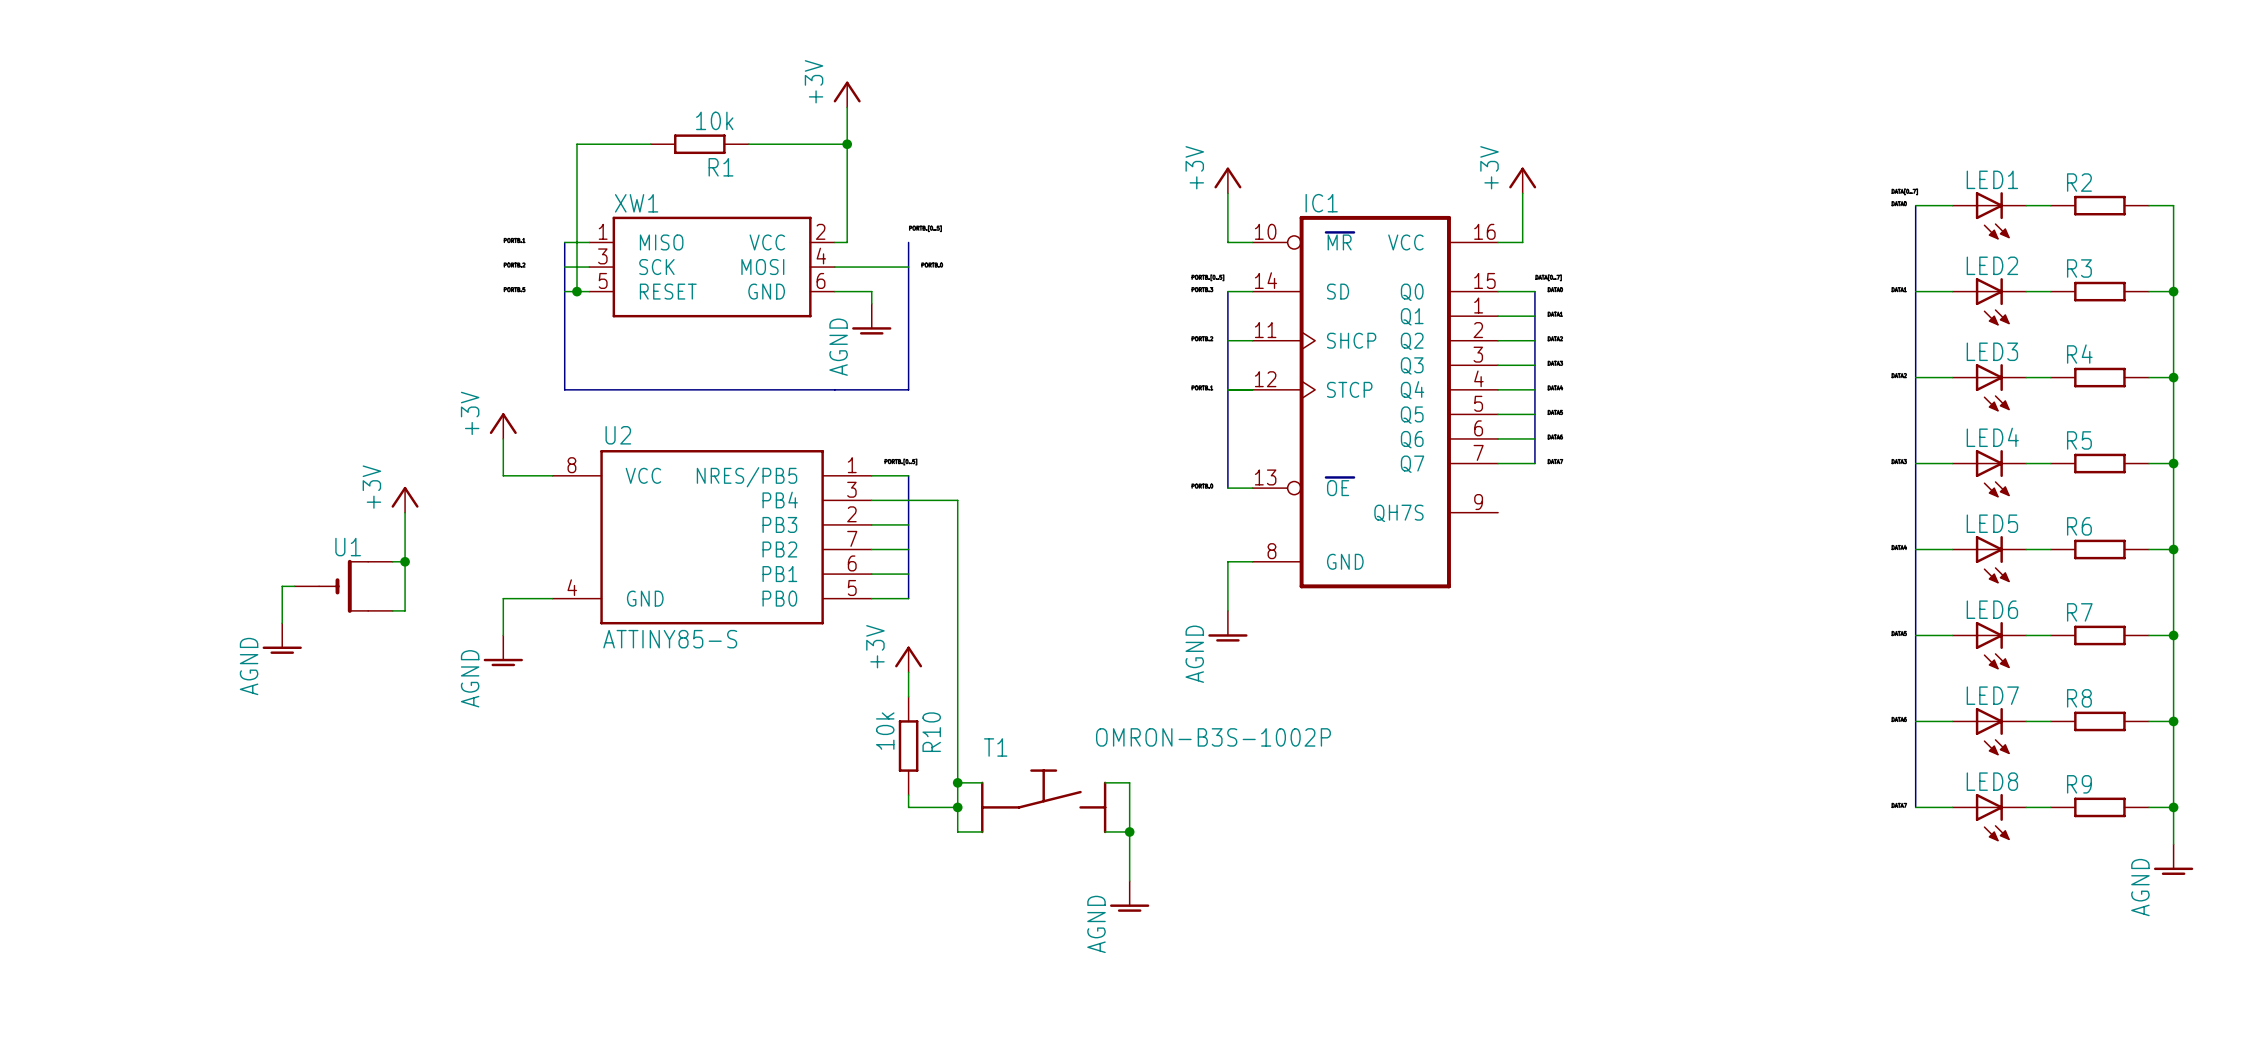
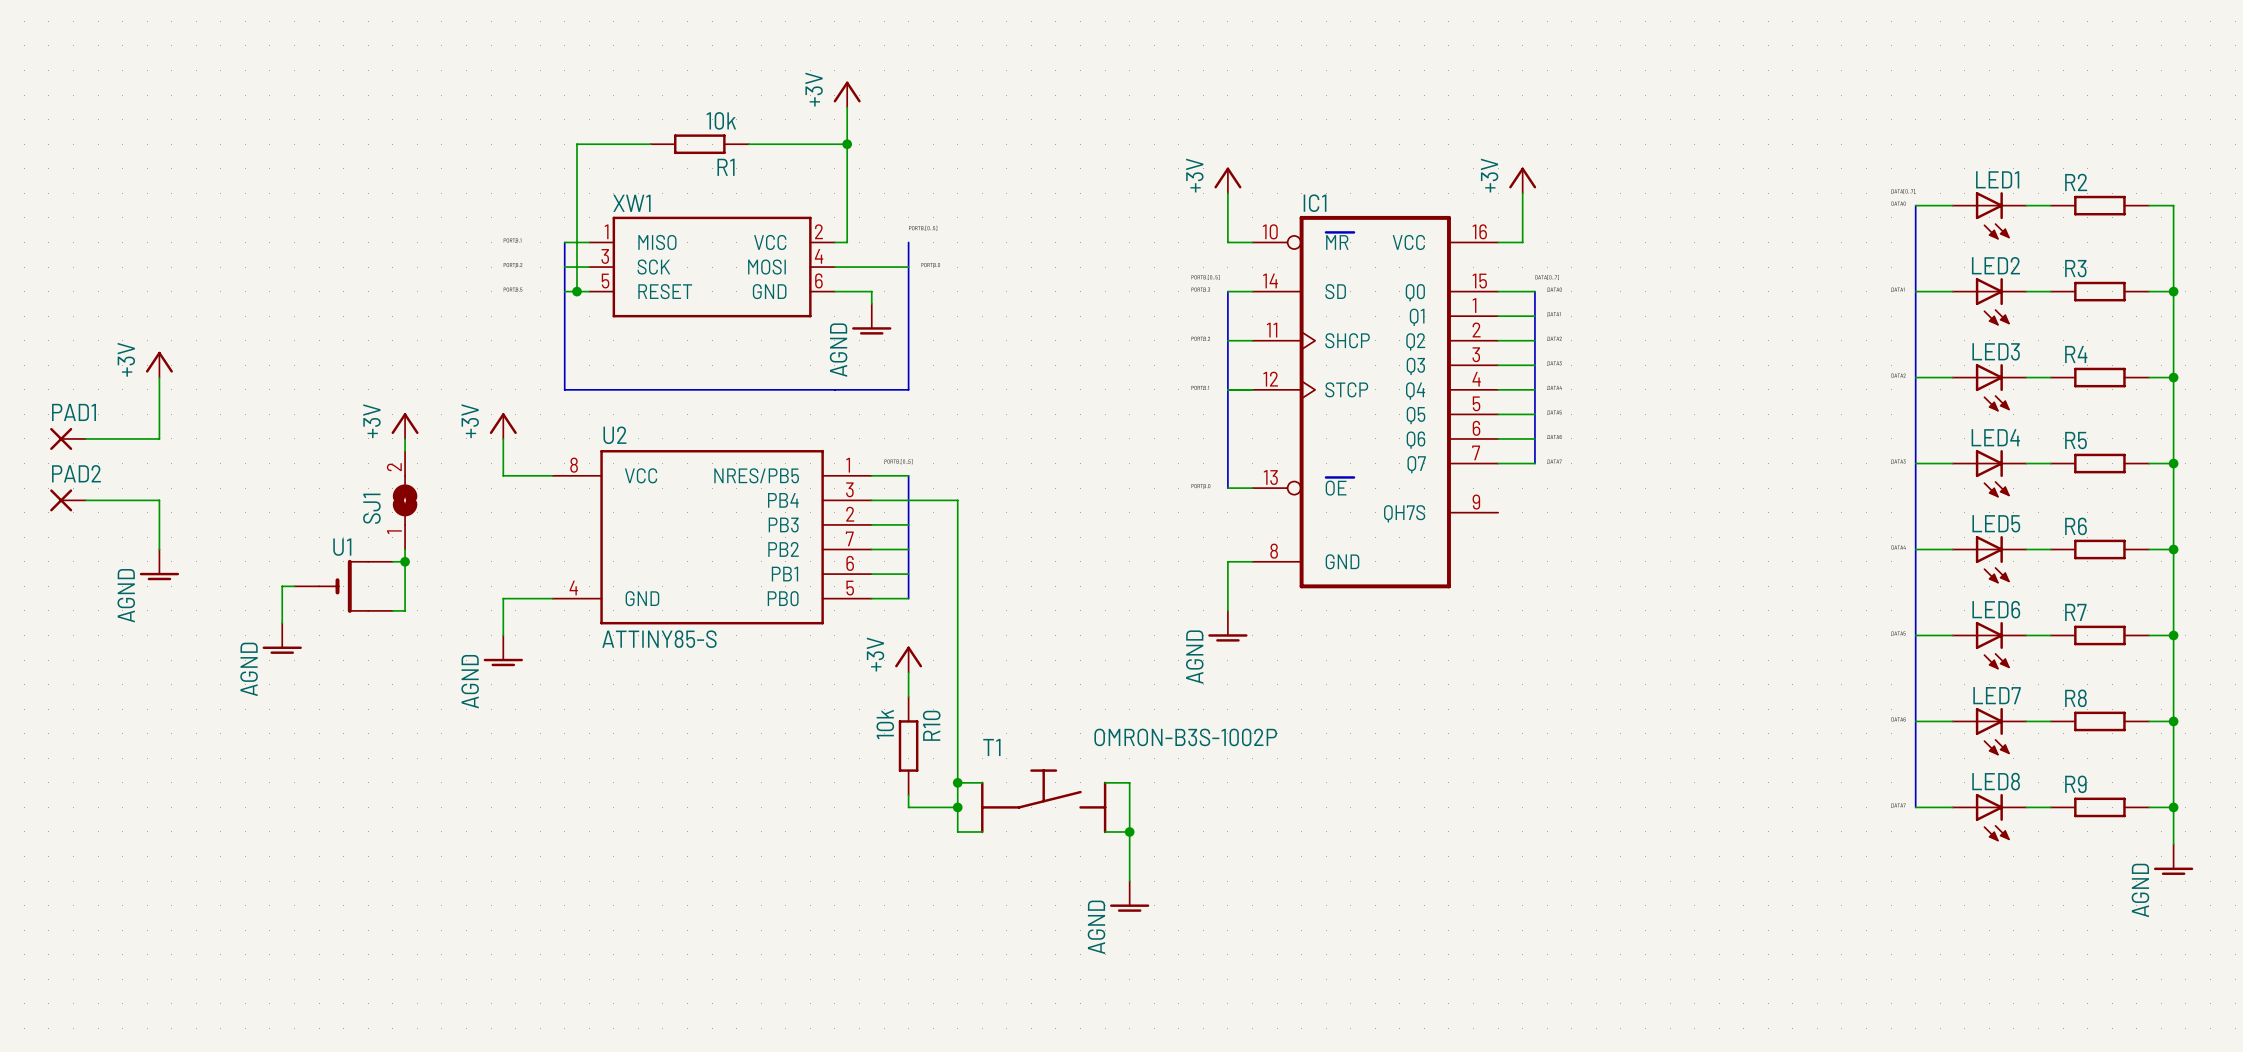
power symbol: none -> +3V (159, 364)
wire: none -> (159, 377) (159, 438) (85, 438)
PAD1: none -> (67, 438)
wire: none -> (405, 438) (405, 451)
power symbol position: +3V (405, 499) -> +3V (405, 426)
PAD2: none -> (67, 500)
wire: none -> (85, 500) (159, 500) (159, 549)
SJ1: none -> (405, 500)
power symbol: none -> AGND (159, 564)

